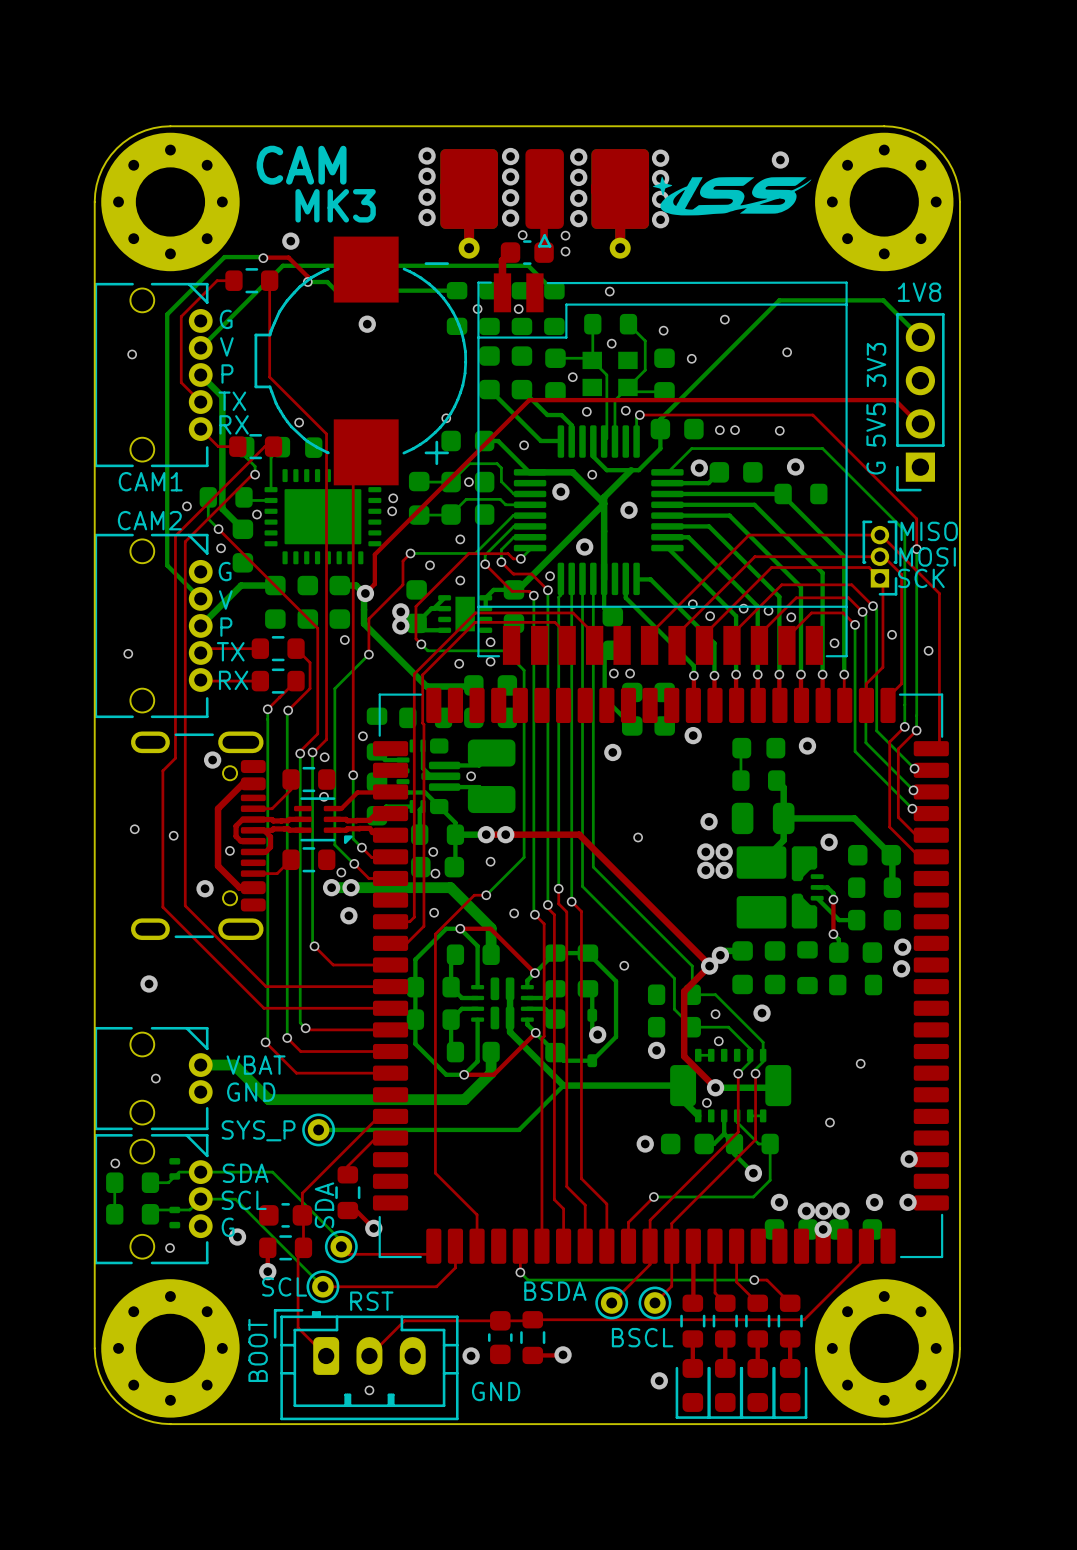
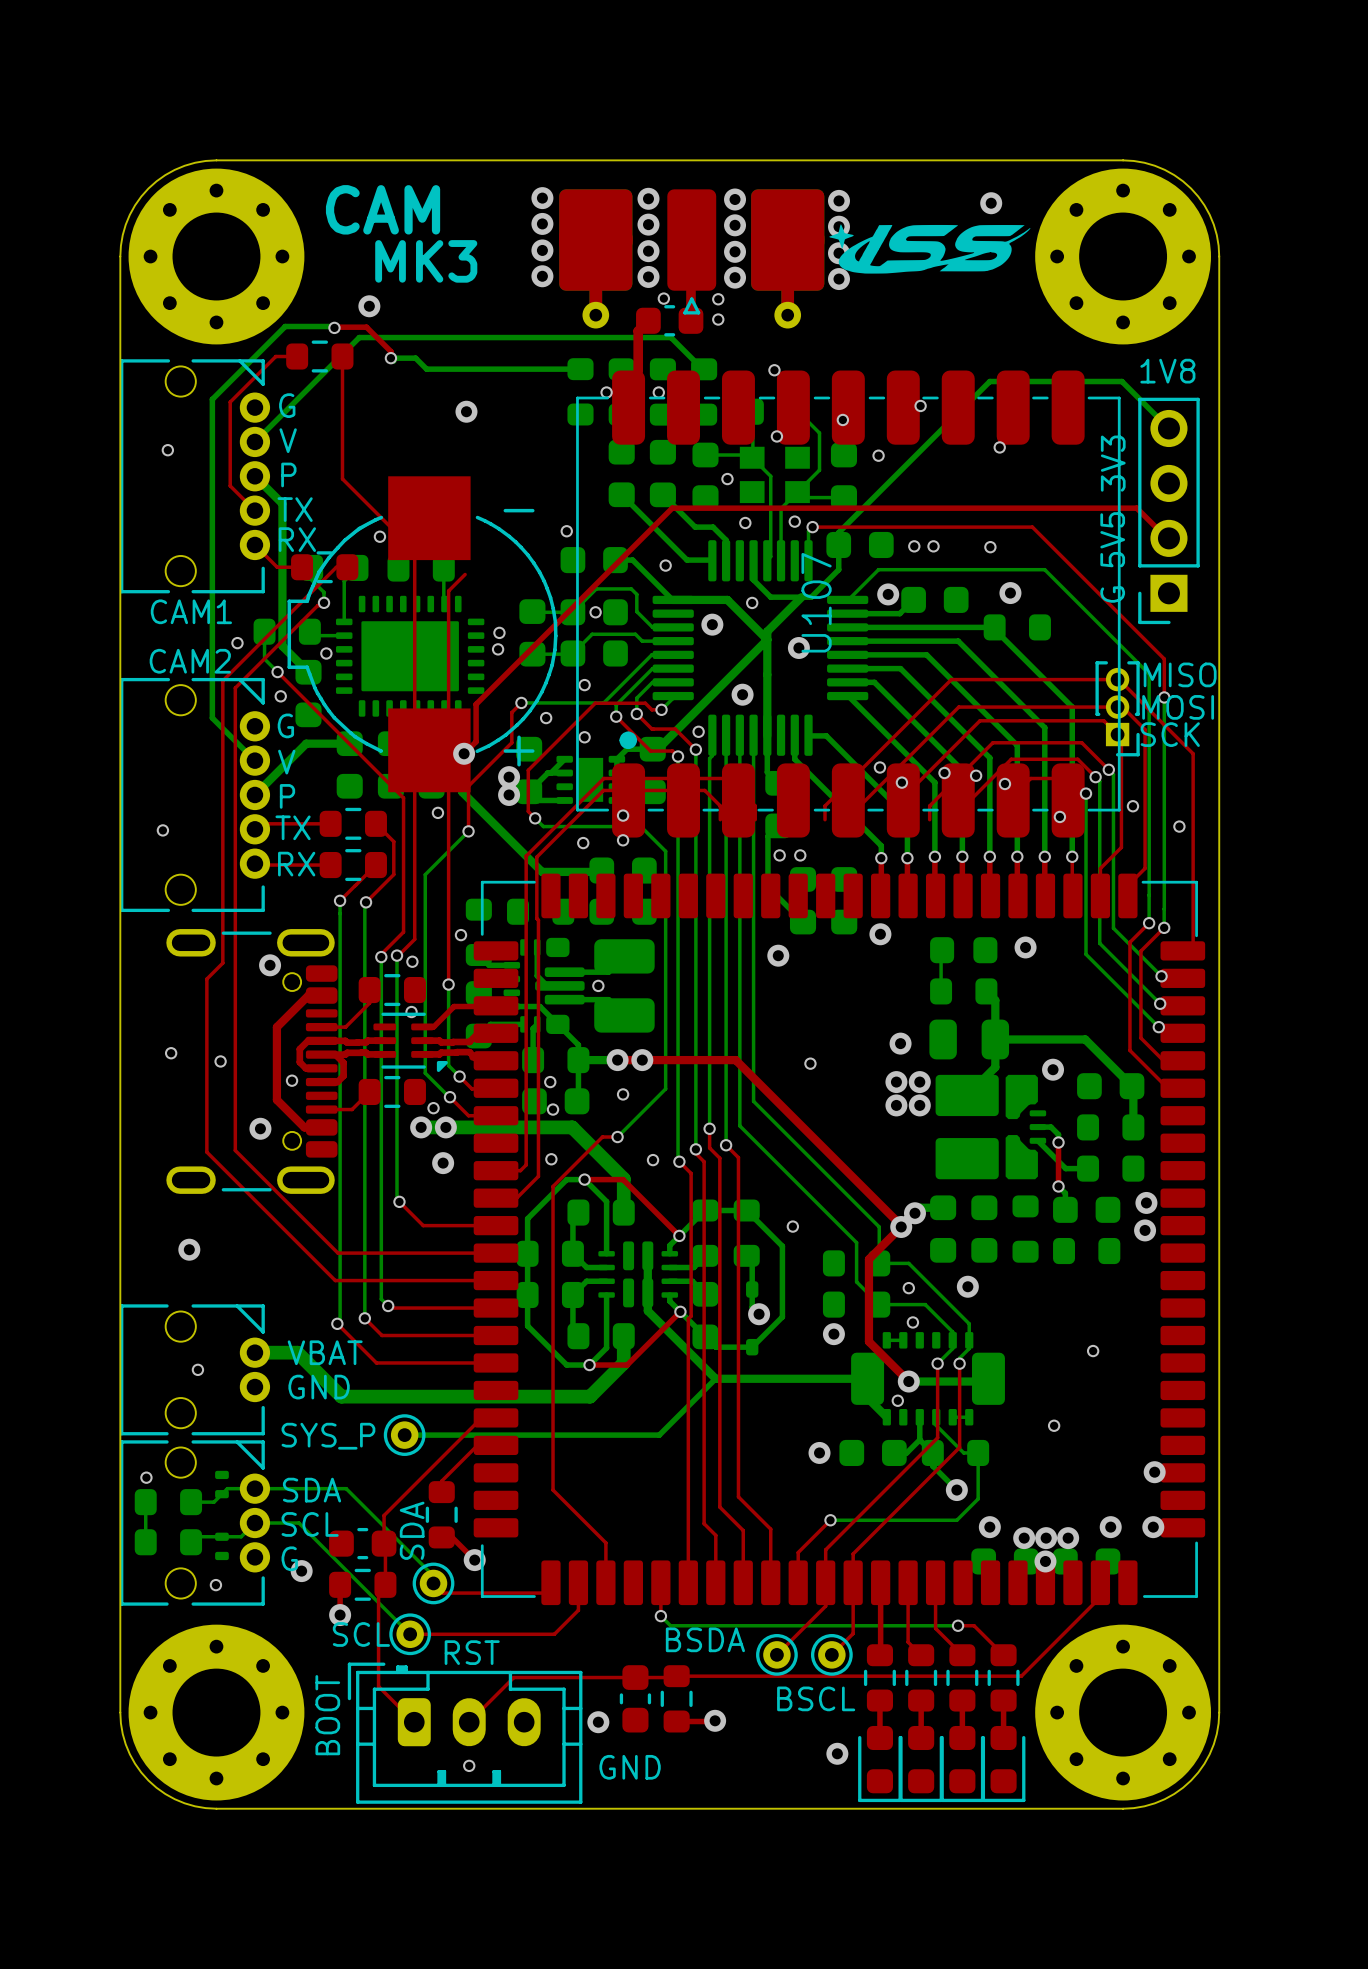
part position: (360, 360) -> (422, 634)
part: (662, 469) -> none
U107: none -> (848, 604)

